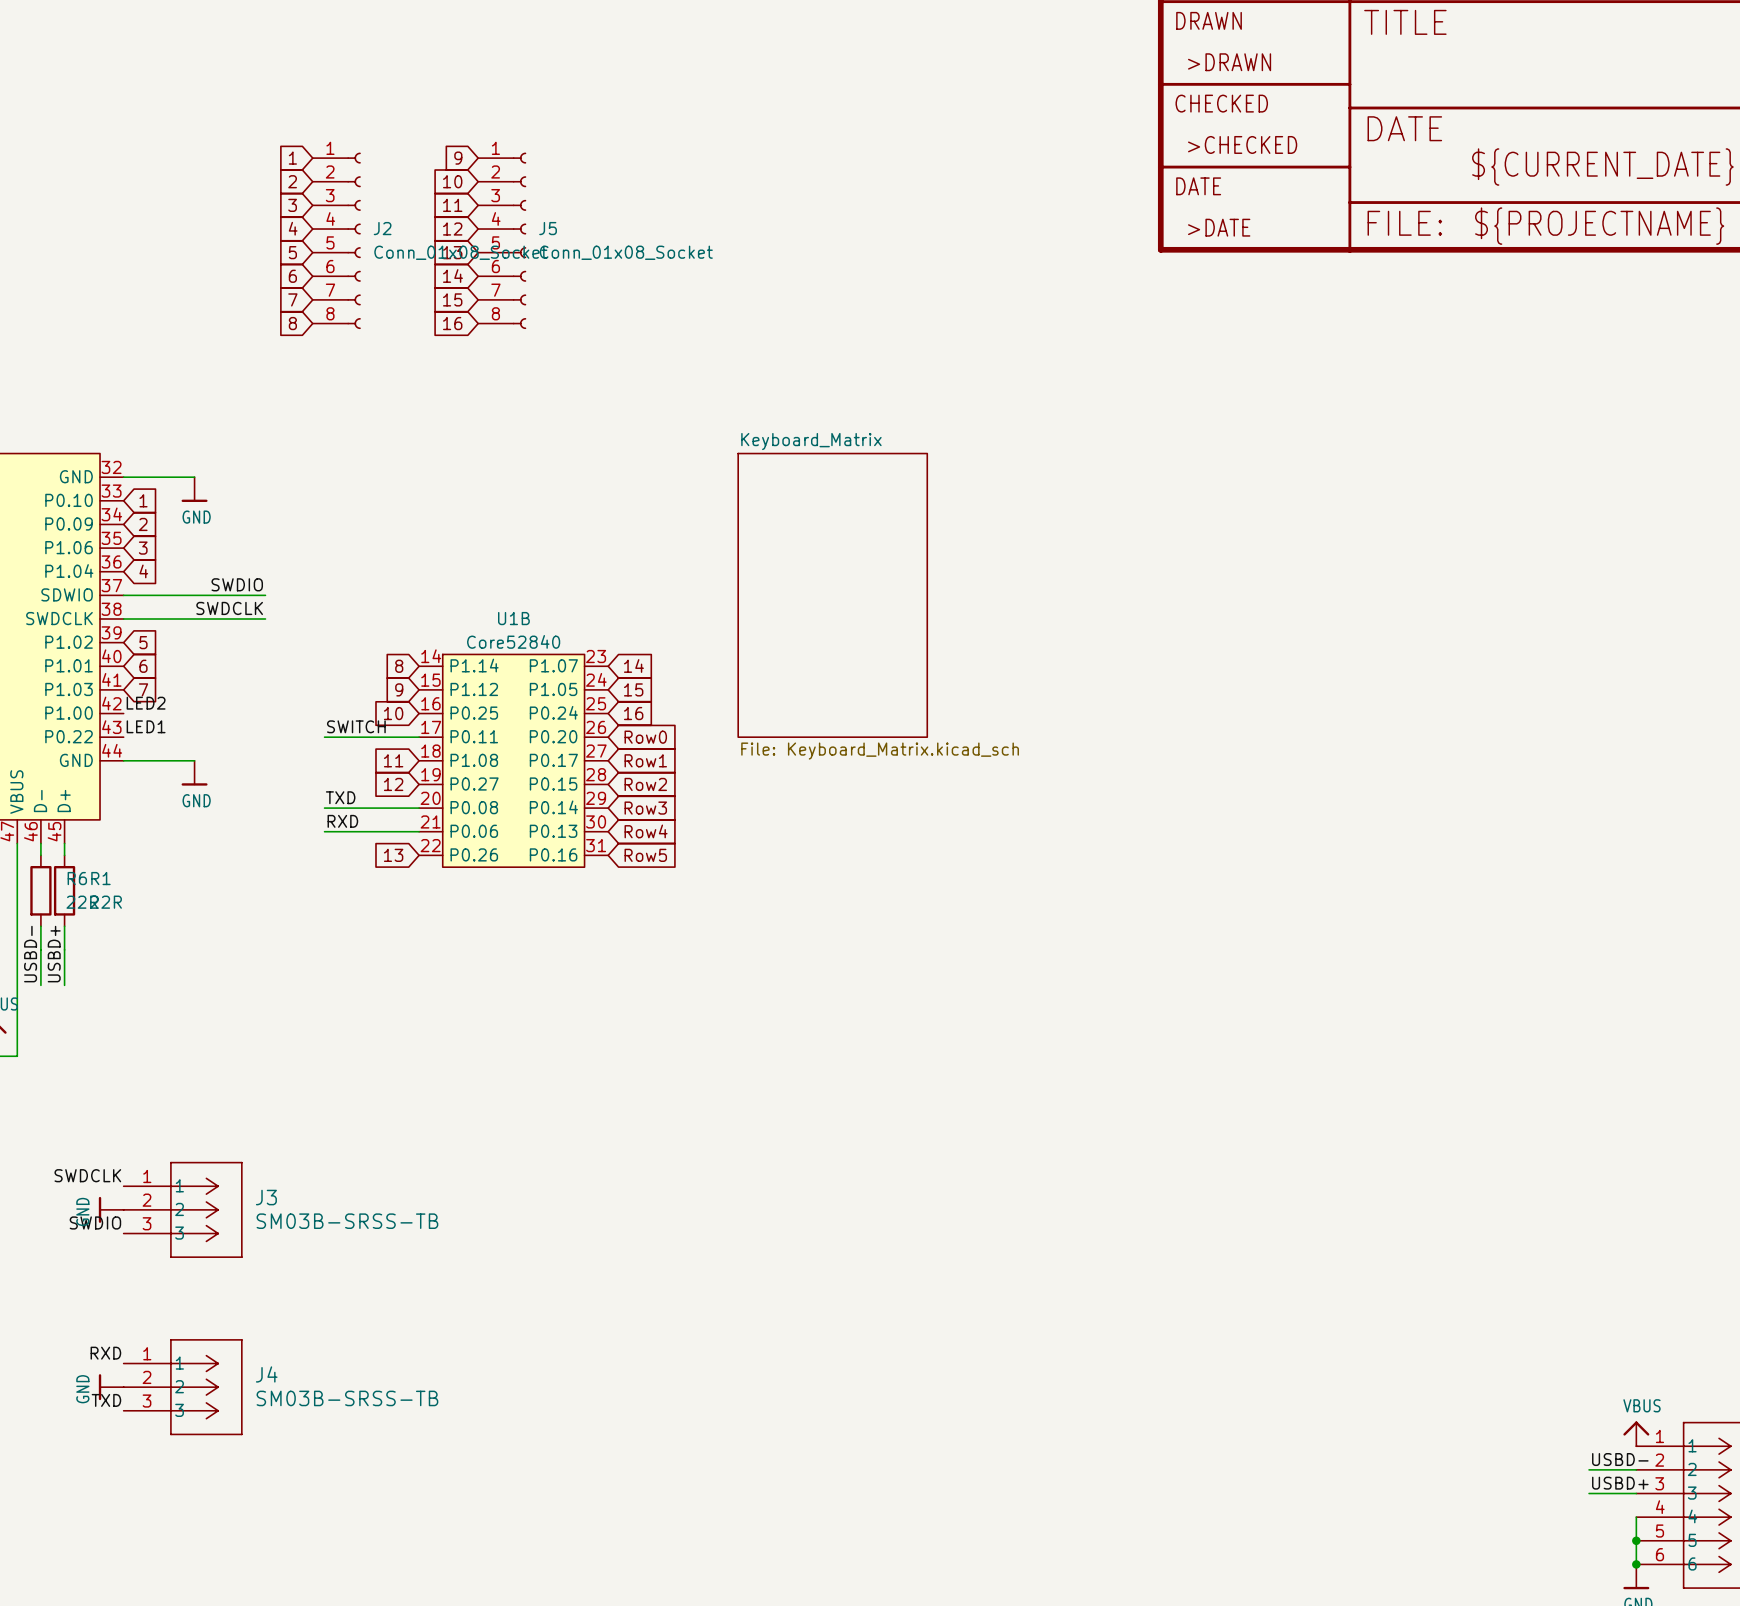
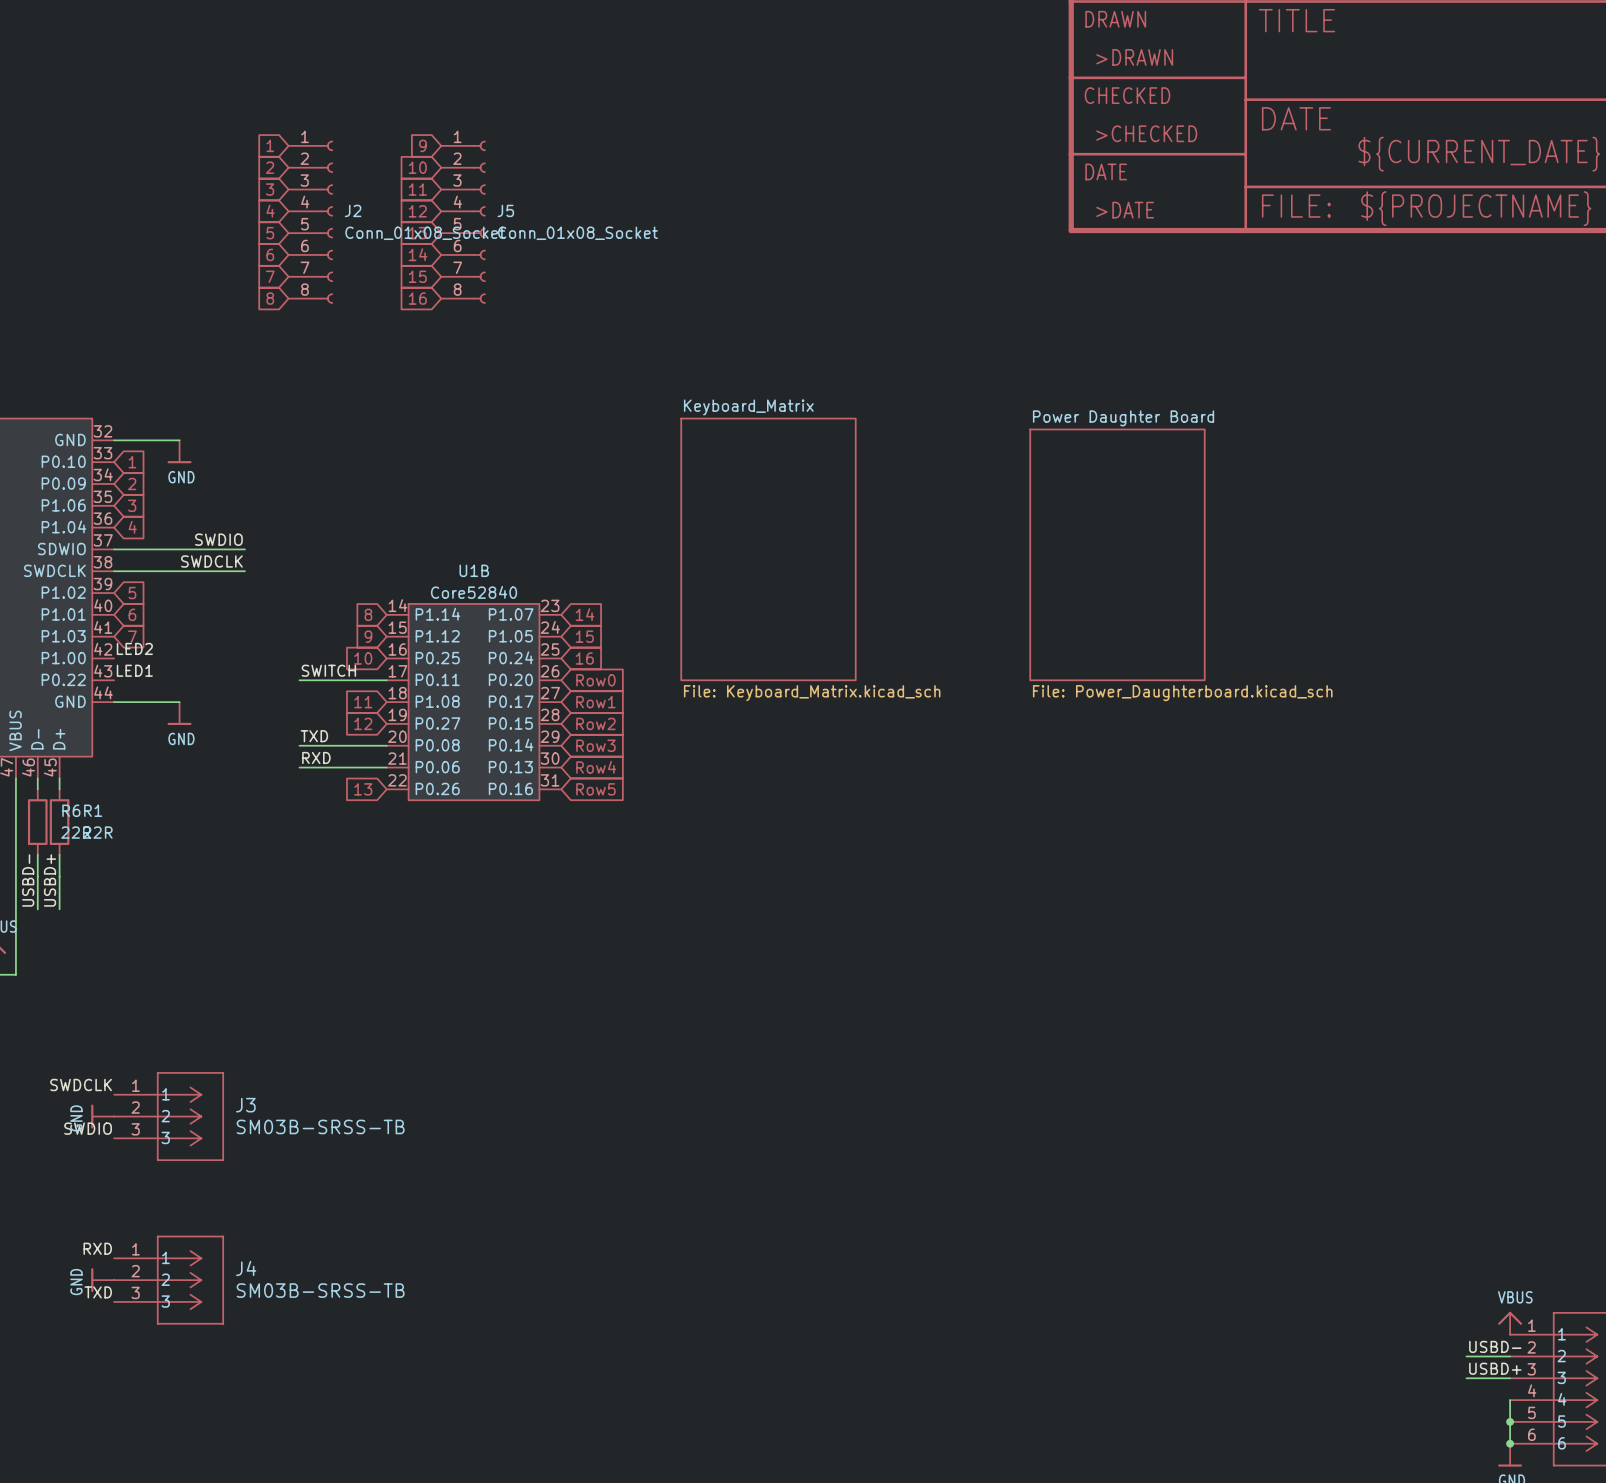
sheet Power Daughter Board: none -> File: Power_Daughterboard.kicad_sch (1117, 554)

